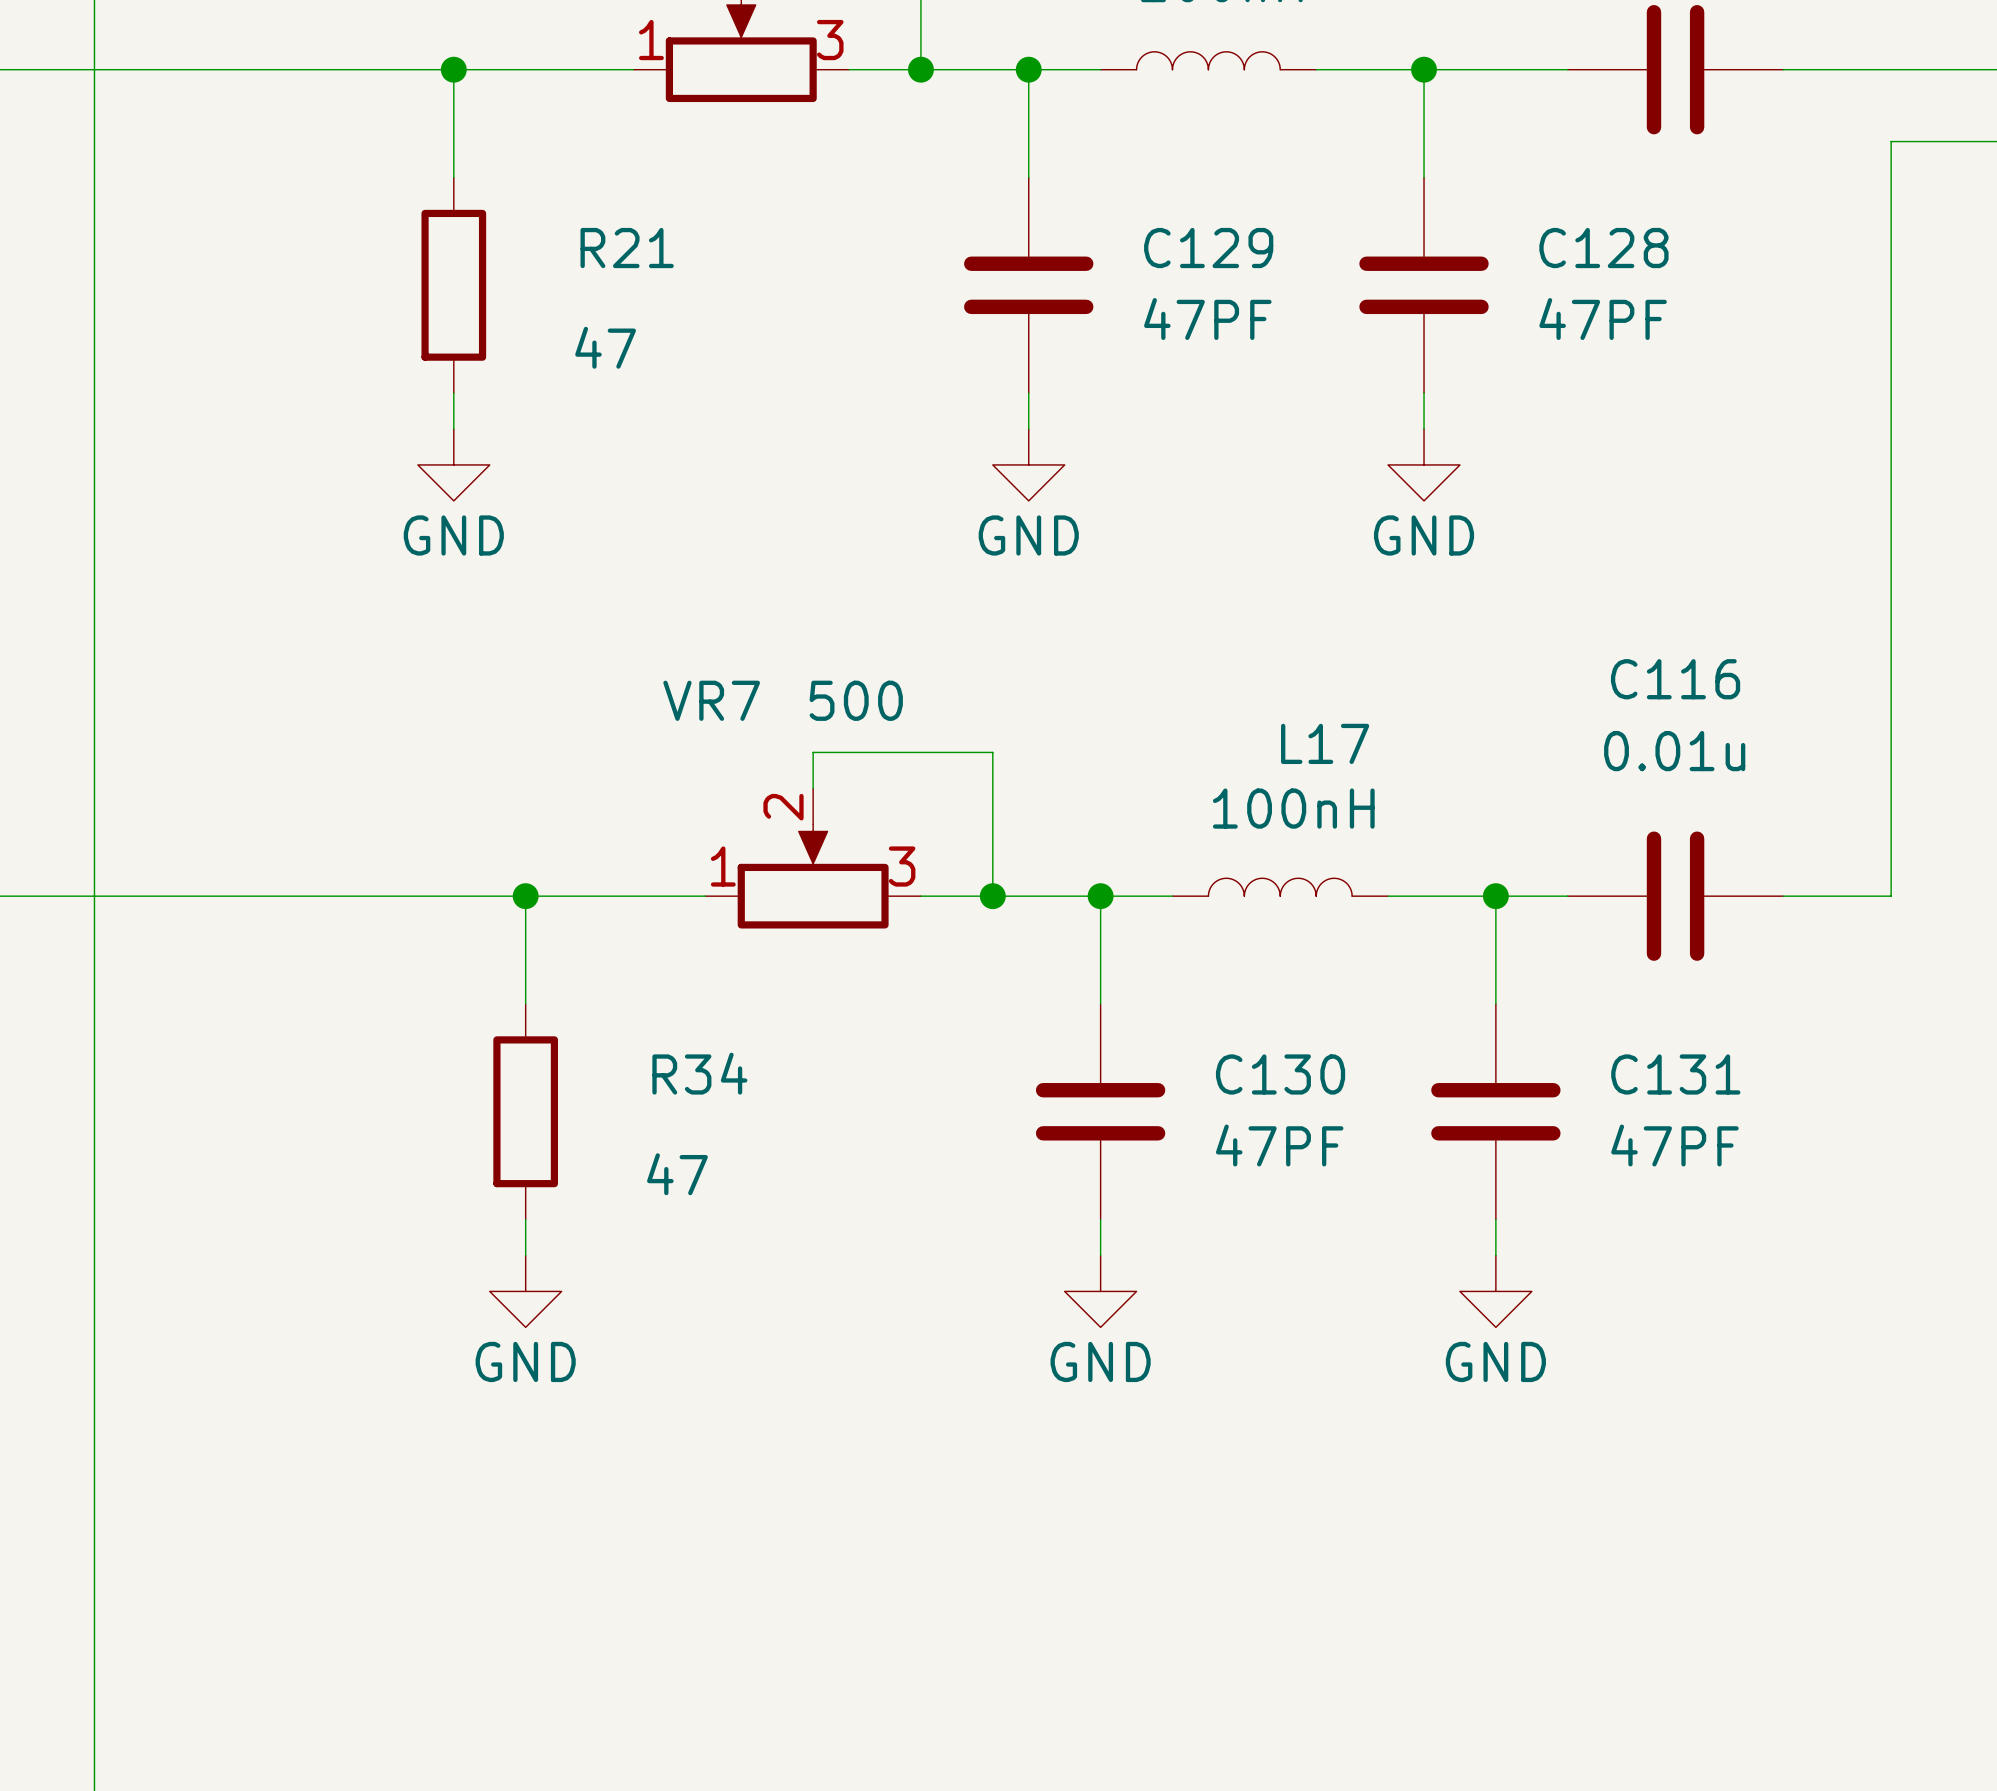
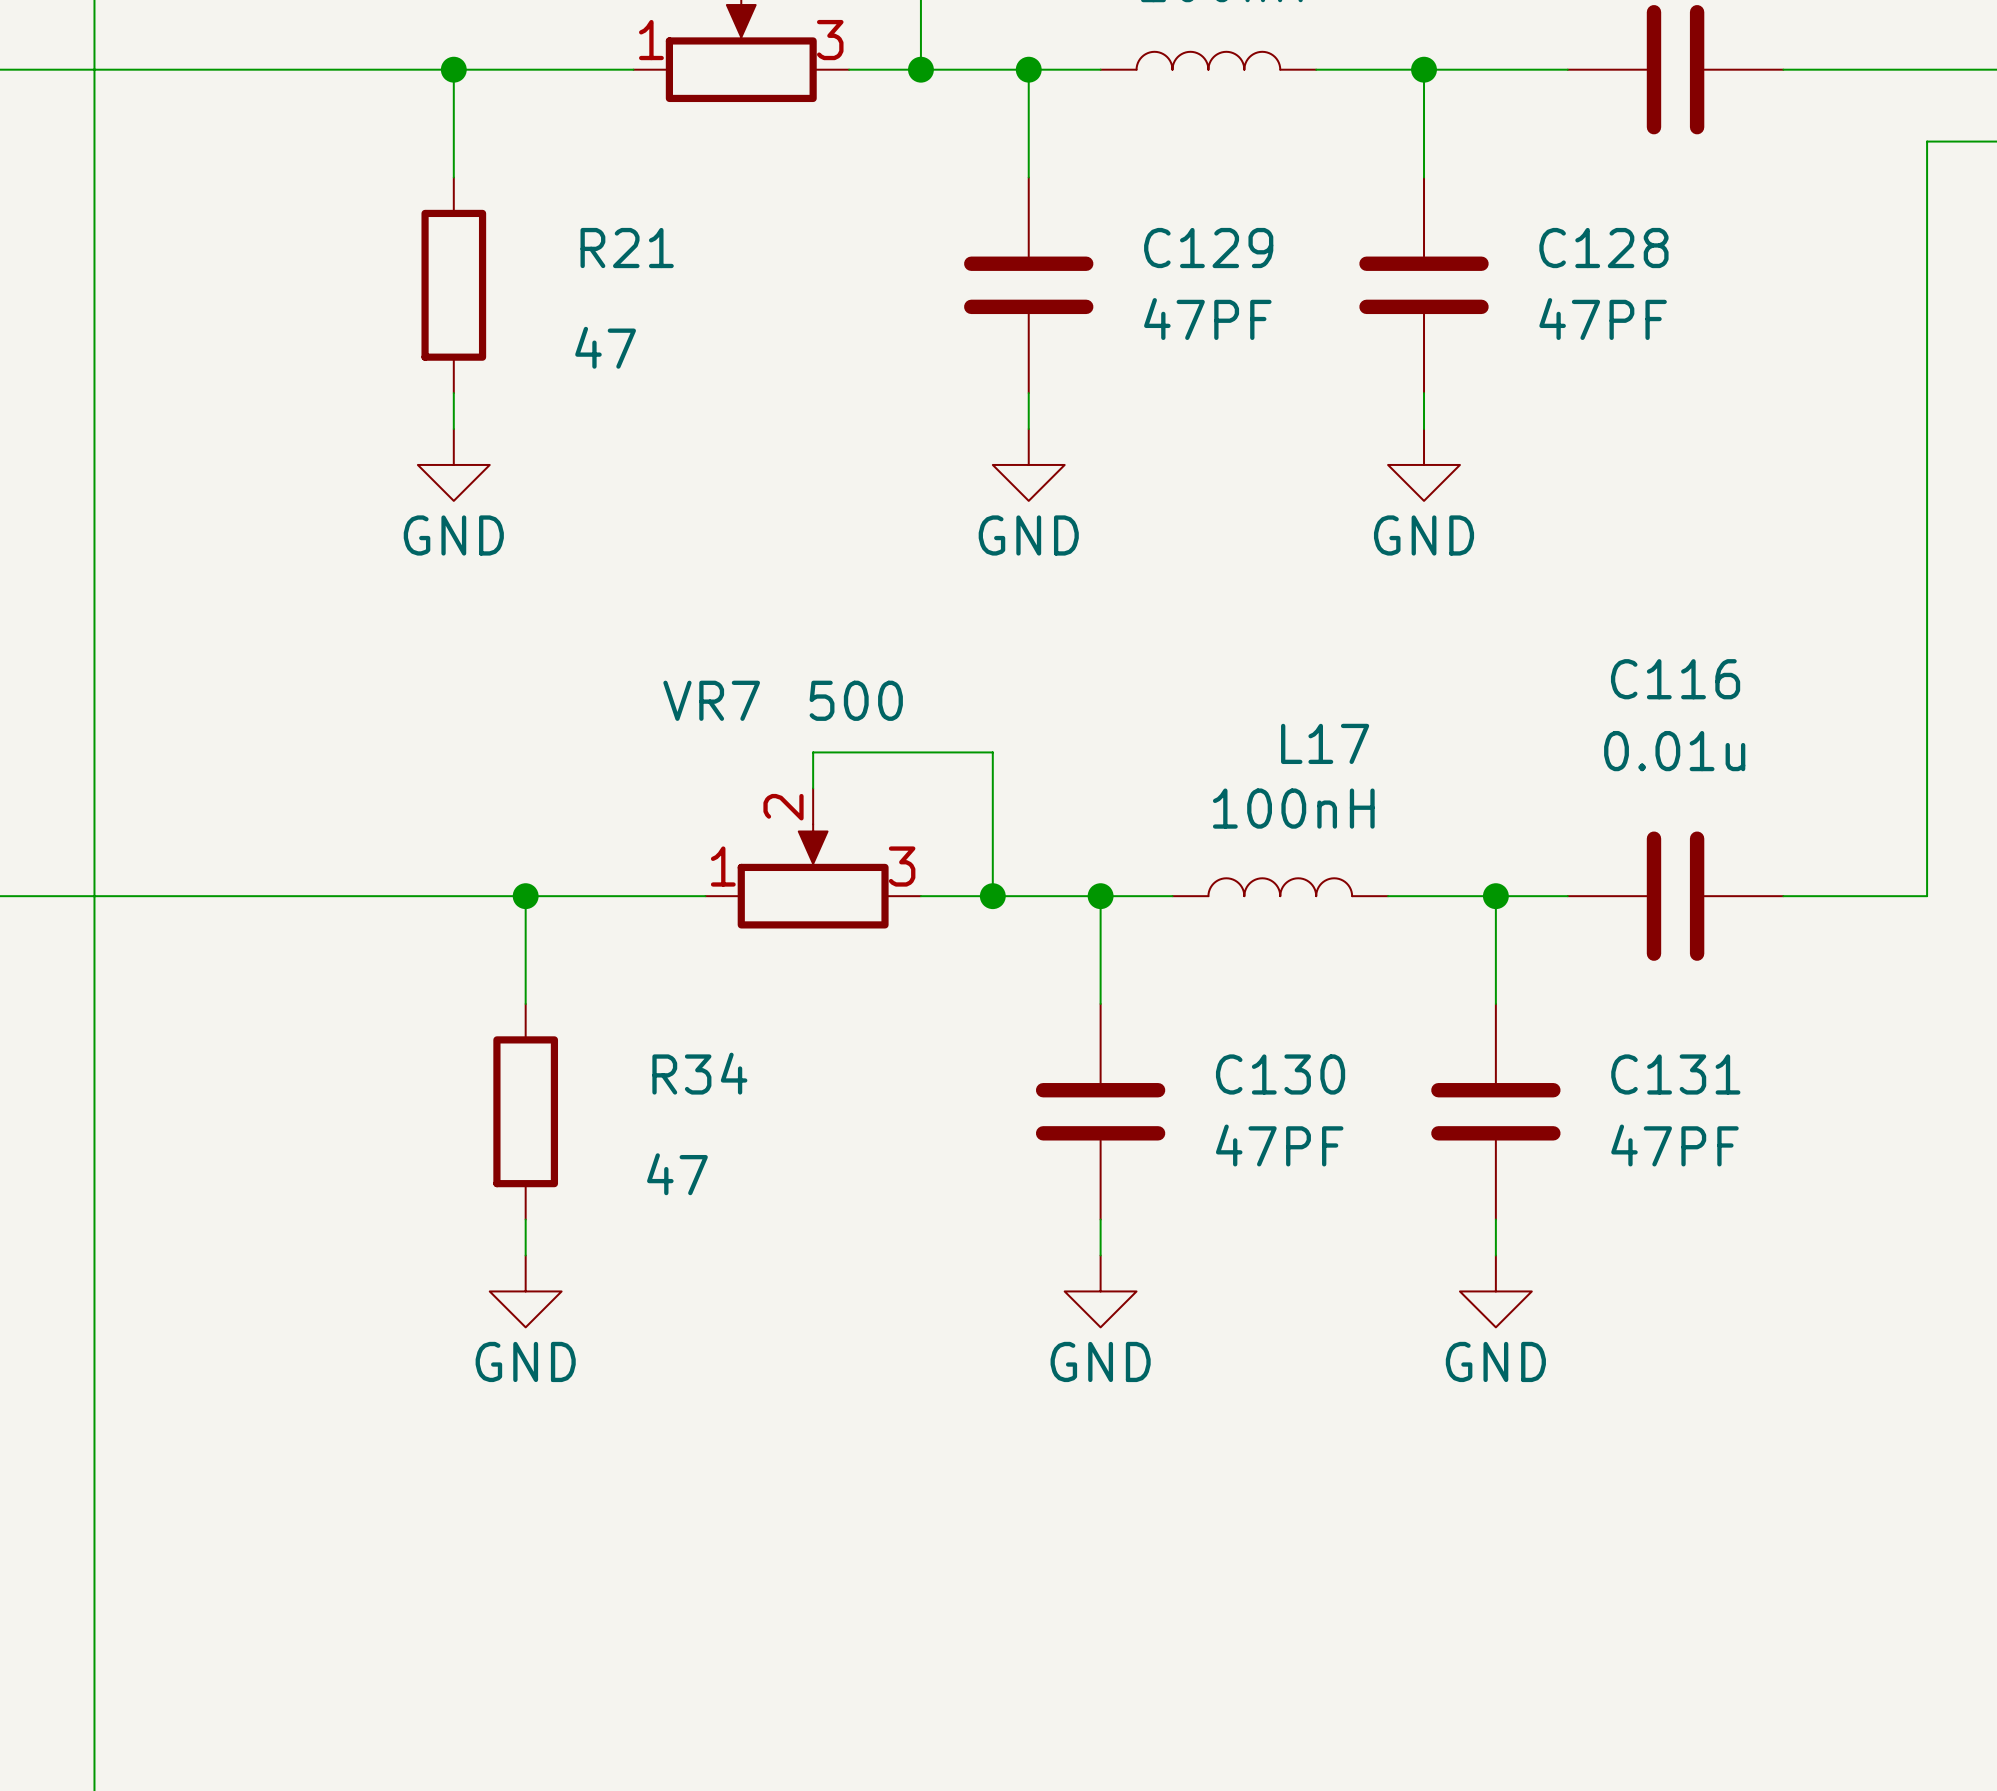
wire: (1927, 141) (1891, 141) (1891, 896) -> (1927, 141) (1927, 896) (1891, 896)

